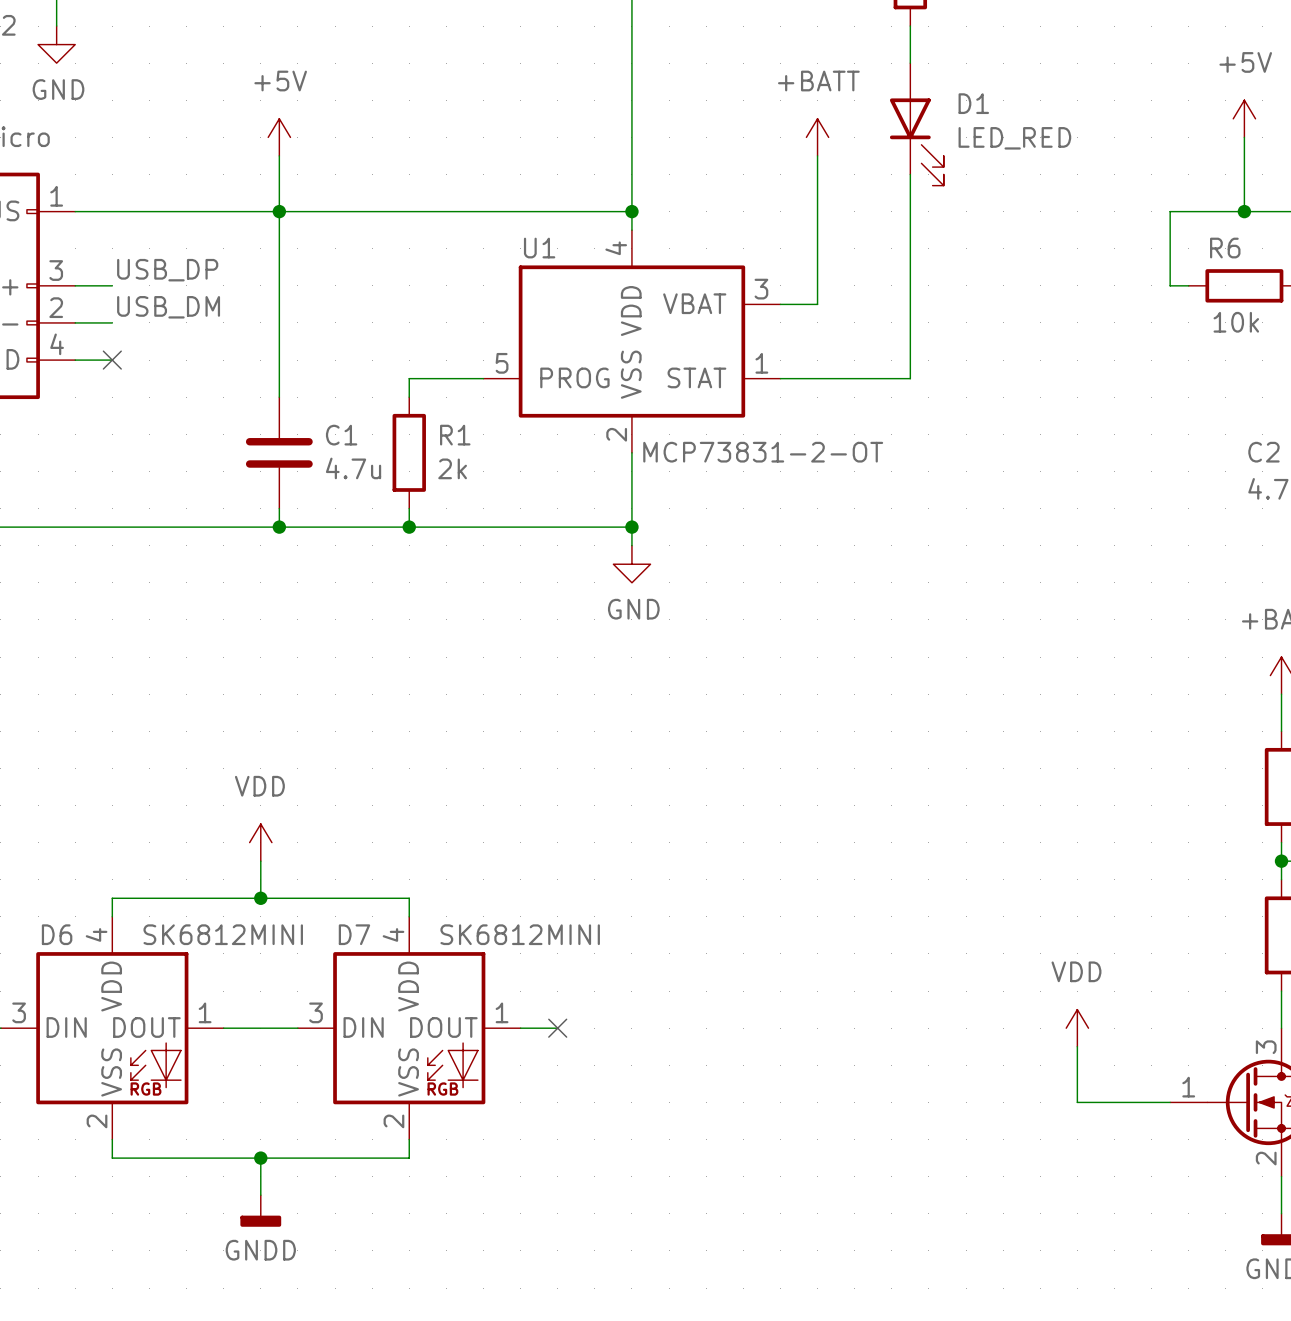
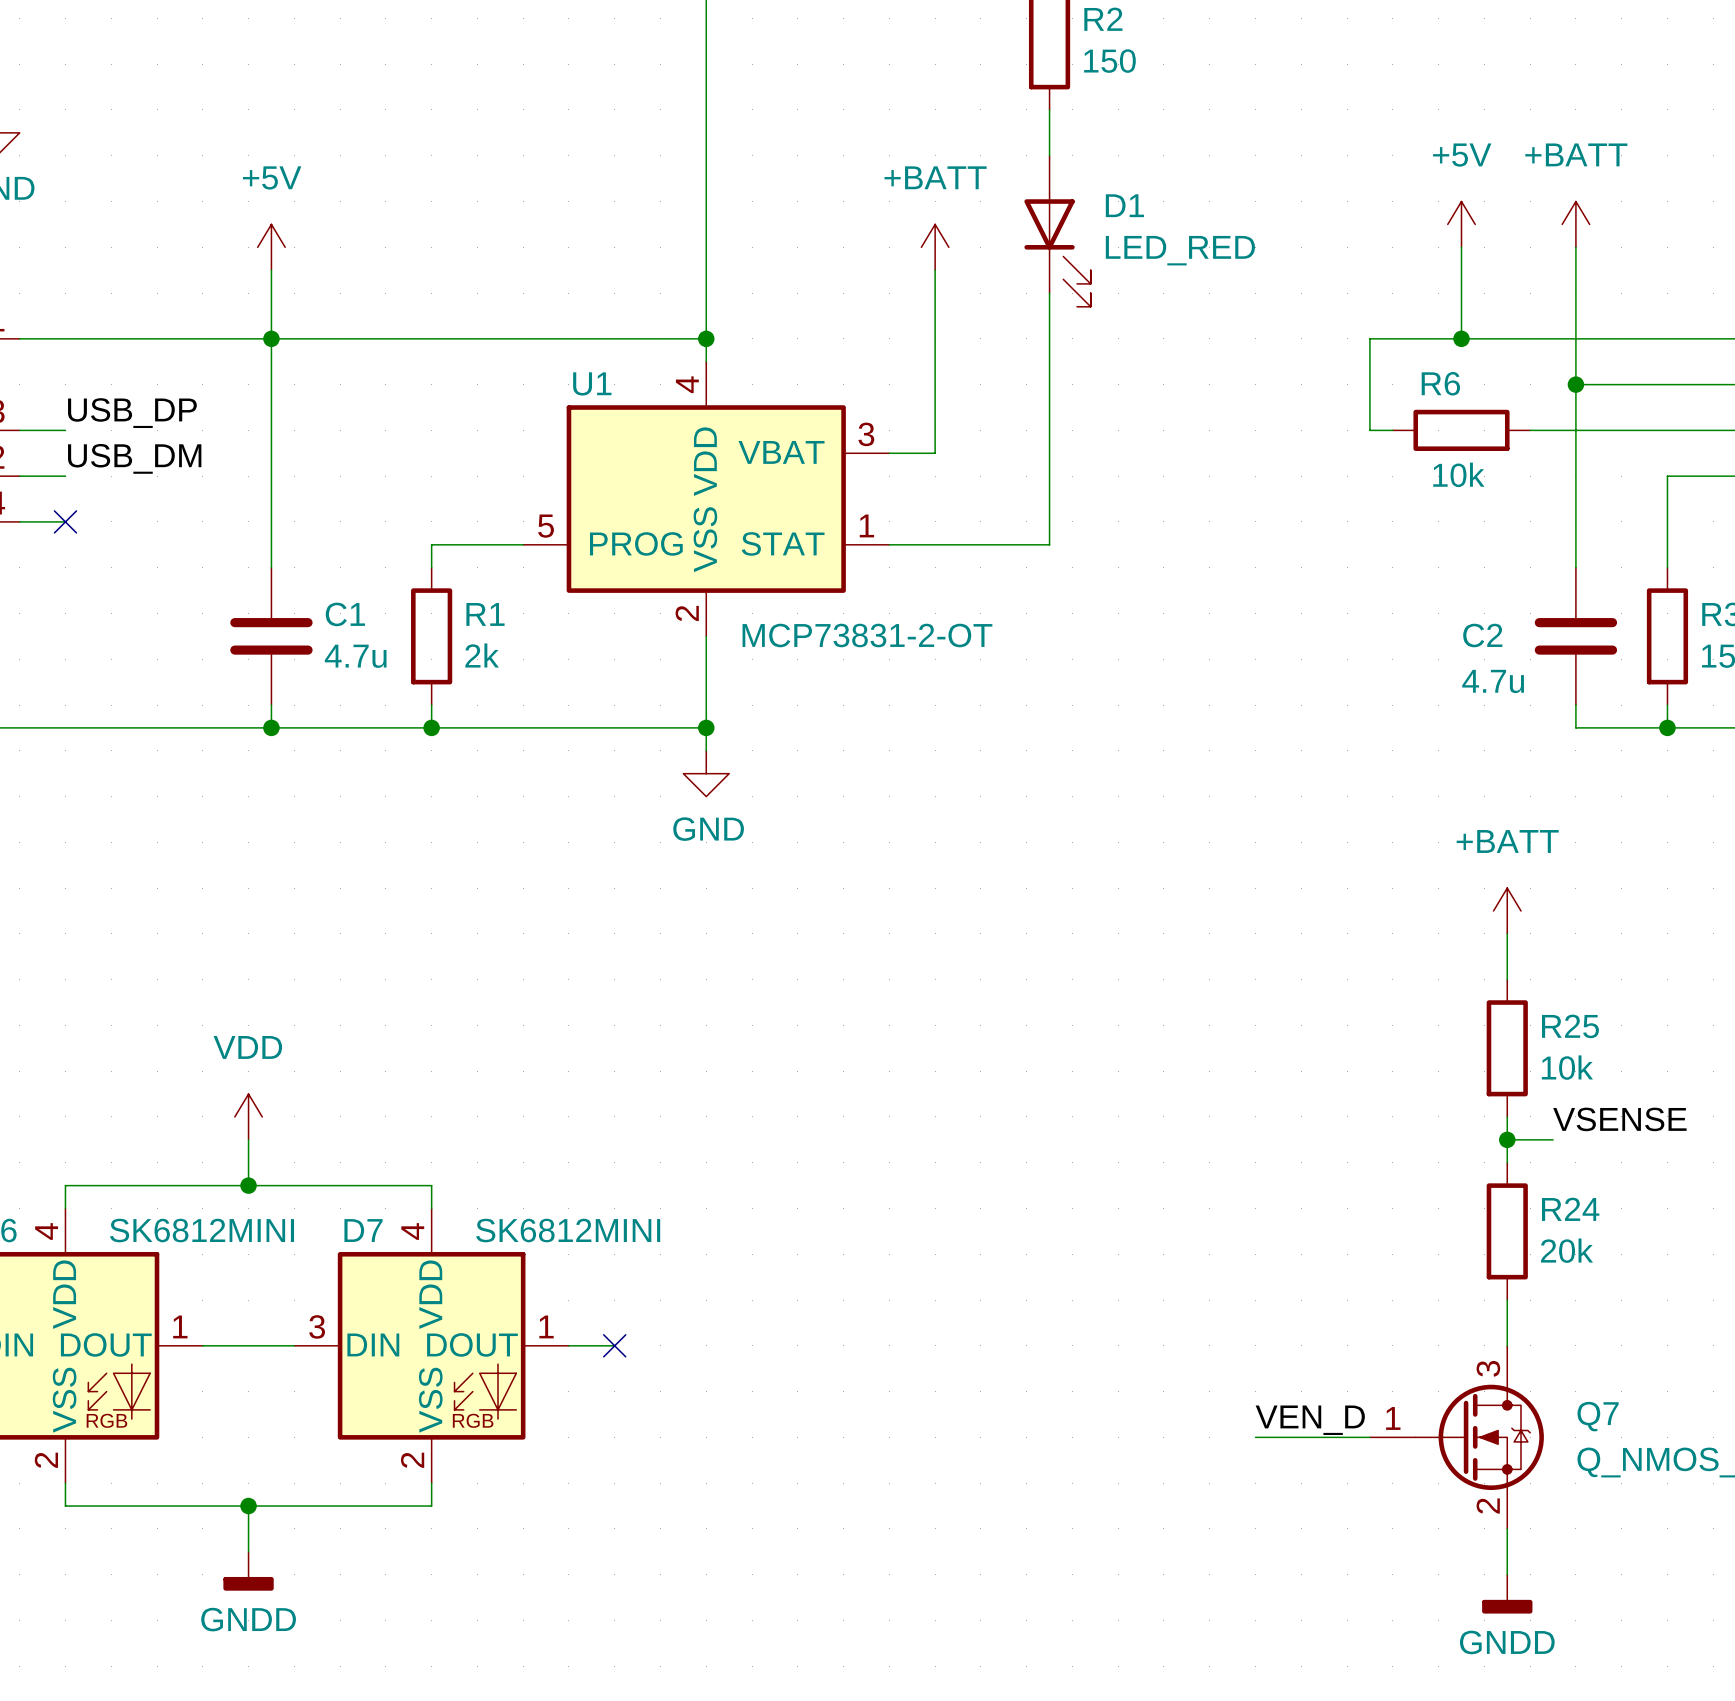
power symbol: VDD (1077, 1028) -> none
wire: (1077, 1046) (1077, 1102) -> none
label: none -> VEN_D (1310, 1420)

